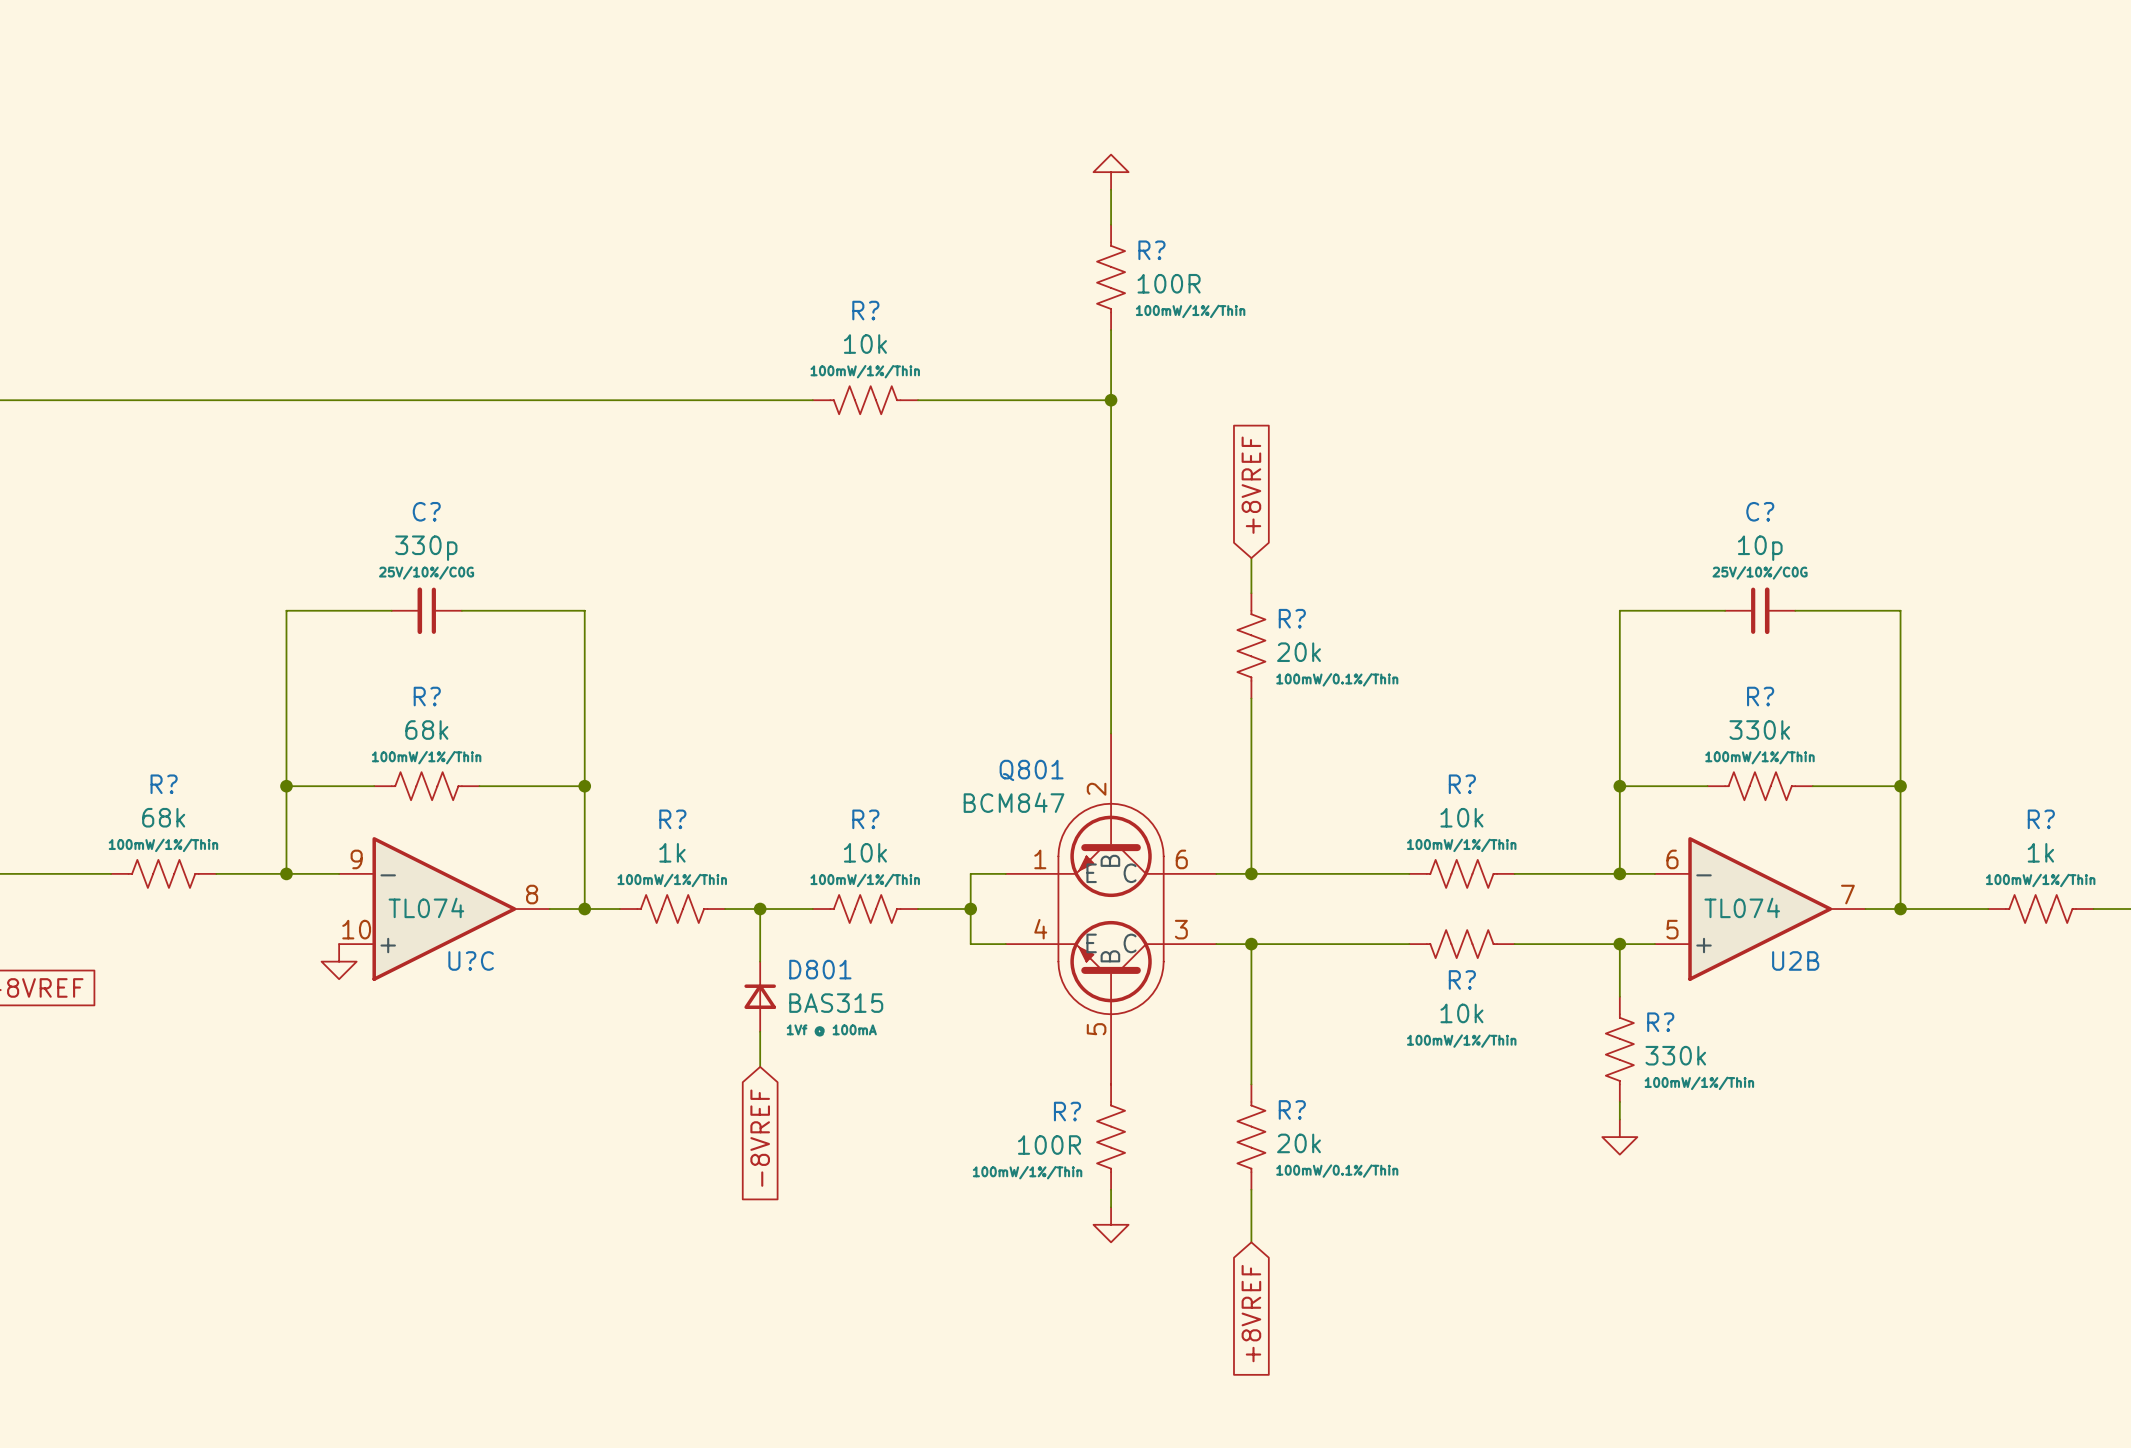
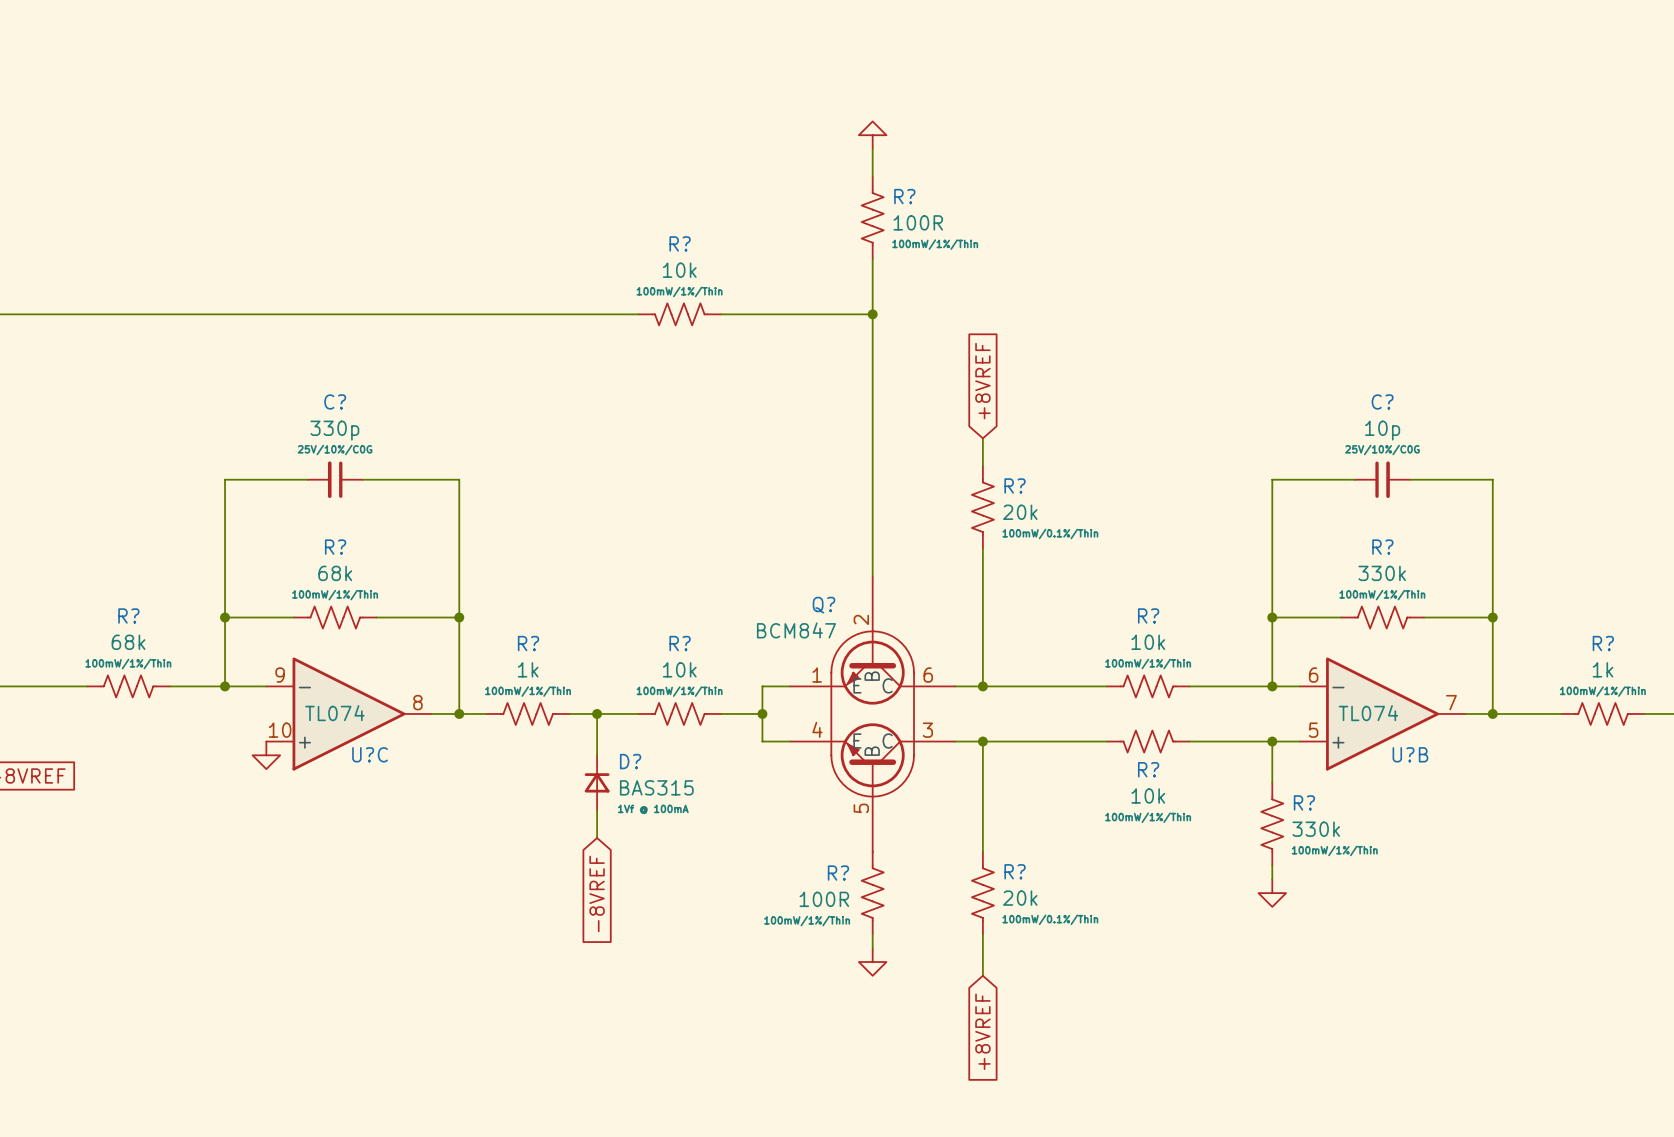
Q801 name: Q801 (1031, 770) -> Q? (824, 605)
U2B name: U2B (1795, 960) -> U?B (1410, 754)
D801 name: D801 (820, 969) -> D? (630, 761)

